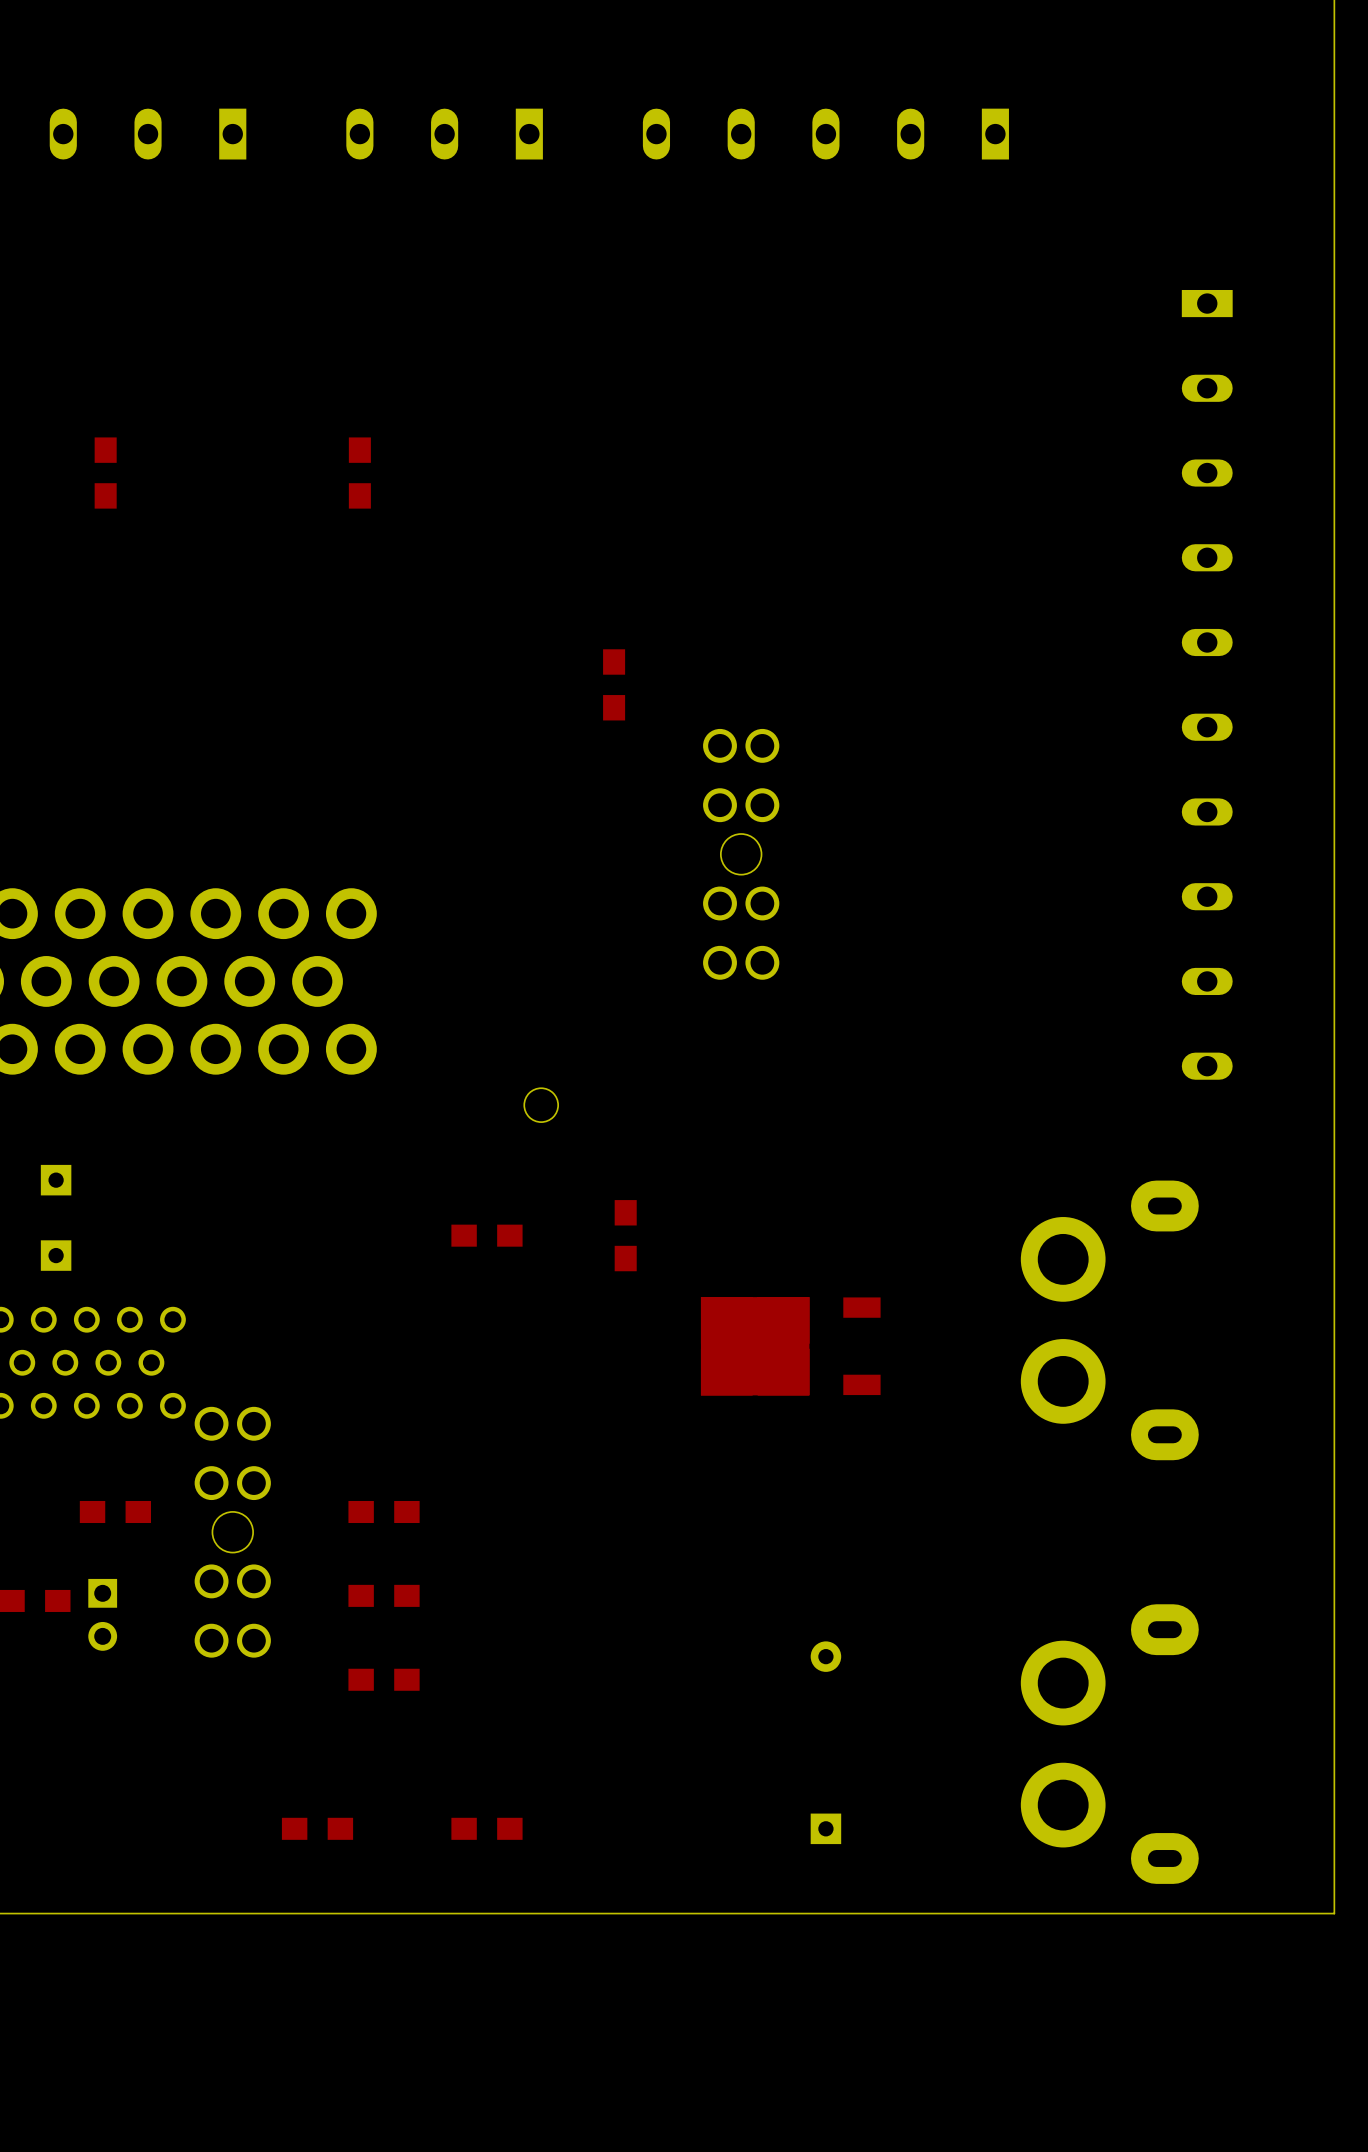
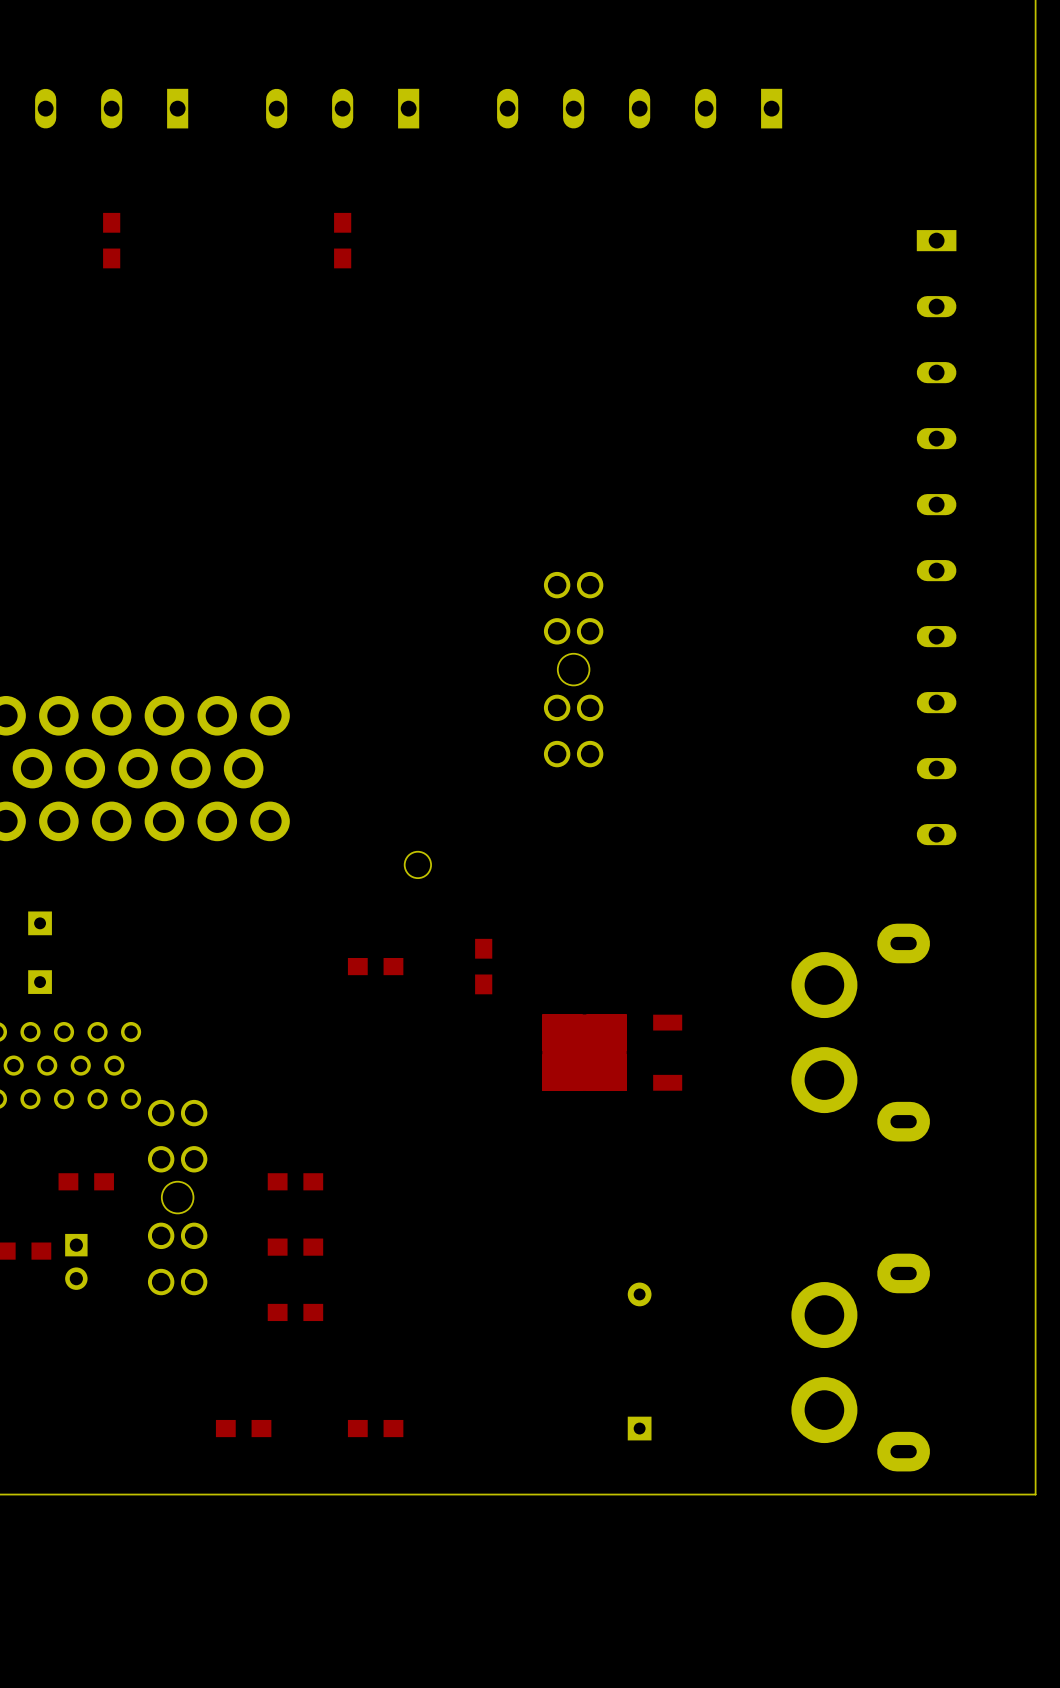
part: none -> (111, 240)
part: none -> (342, 240)
part: (105, 473) -> none
part: (359, 473) -> none
part: (614, 684) -> none

